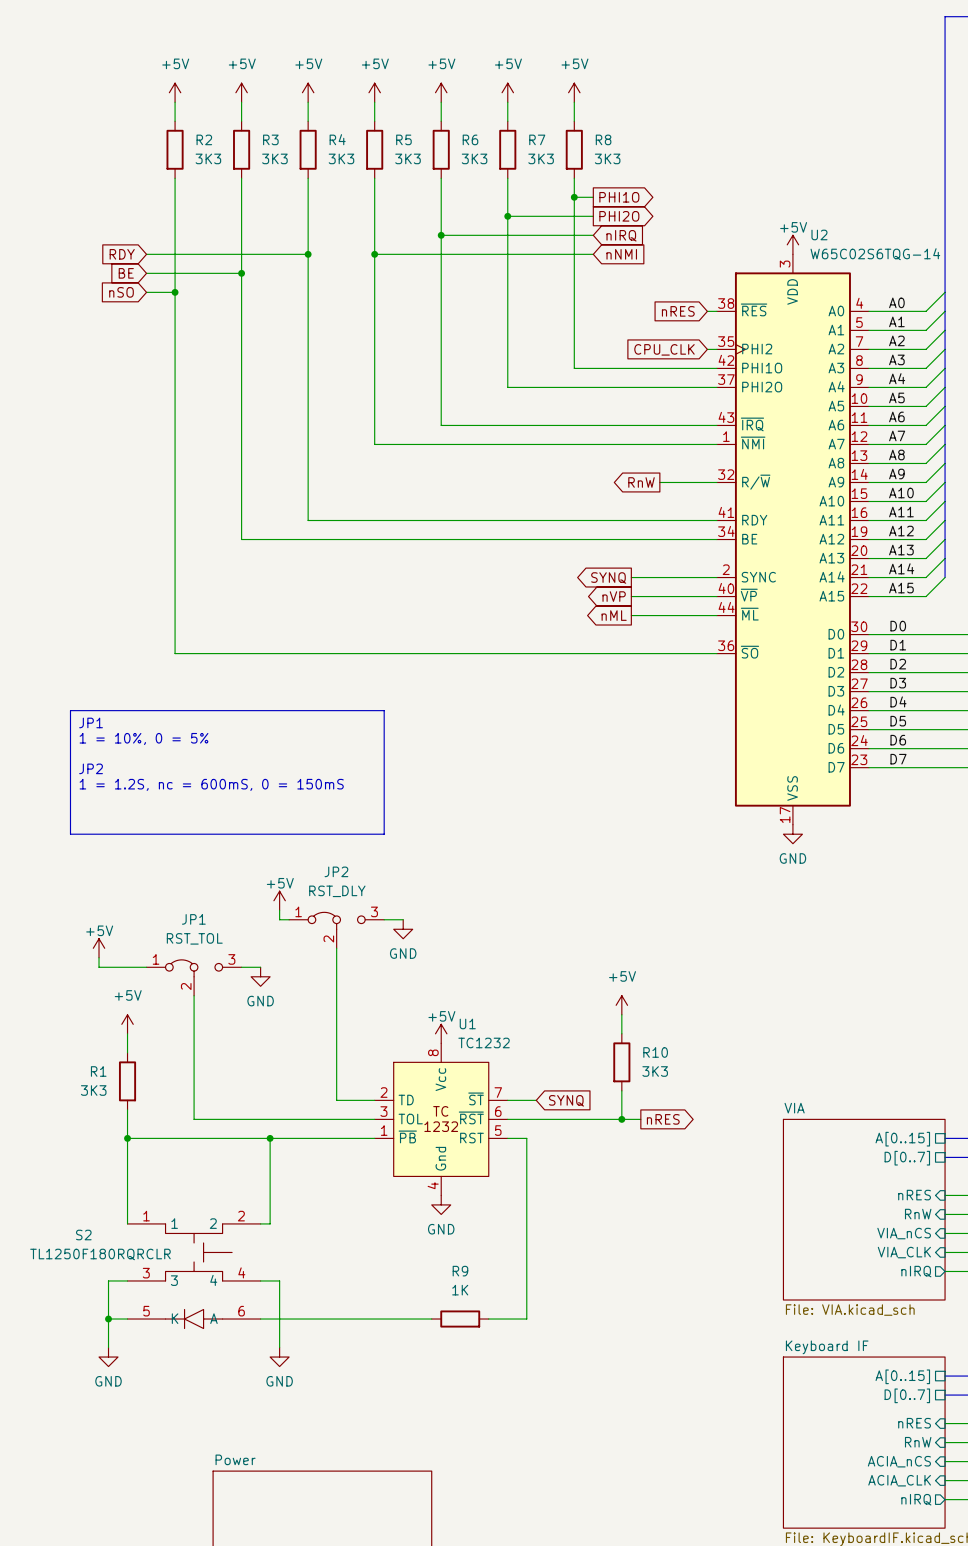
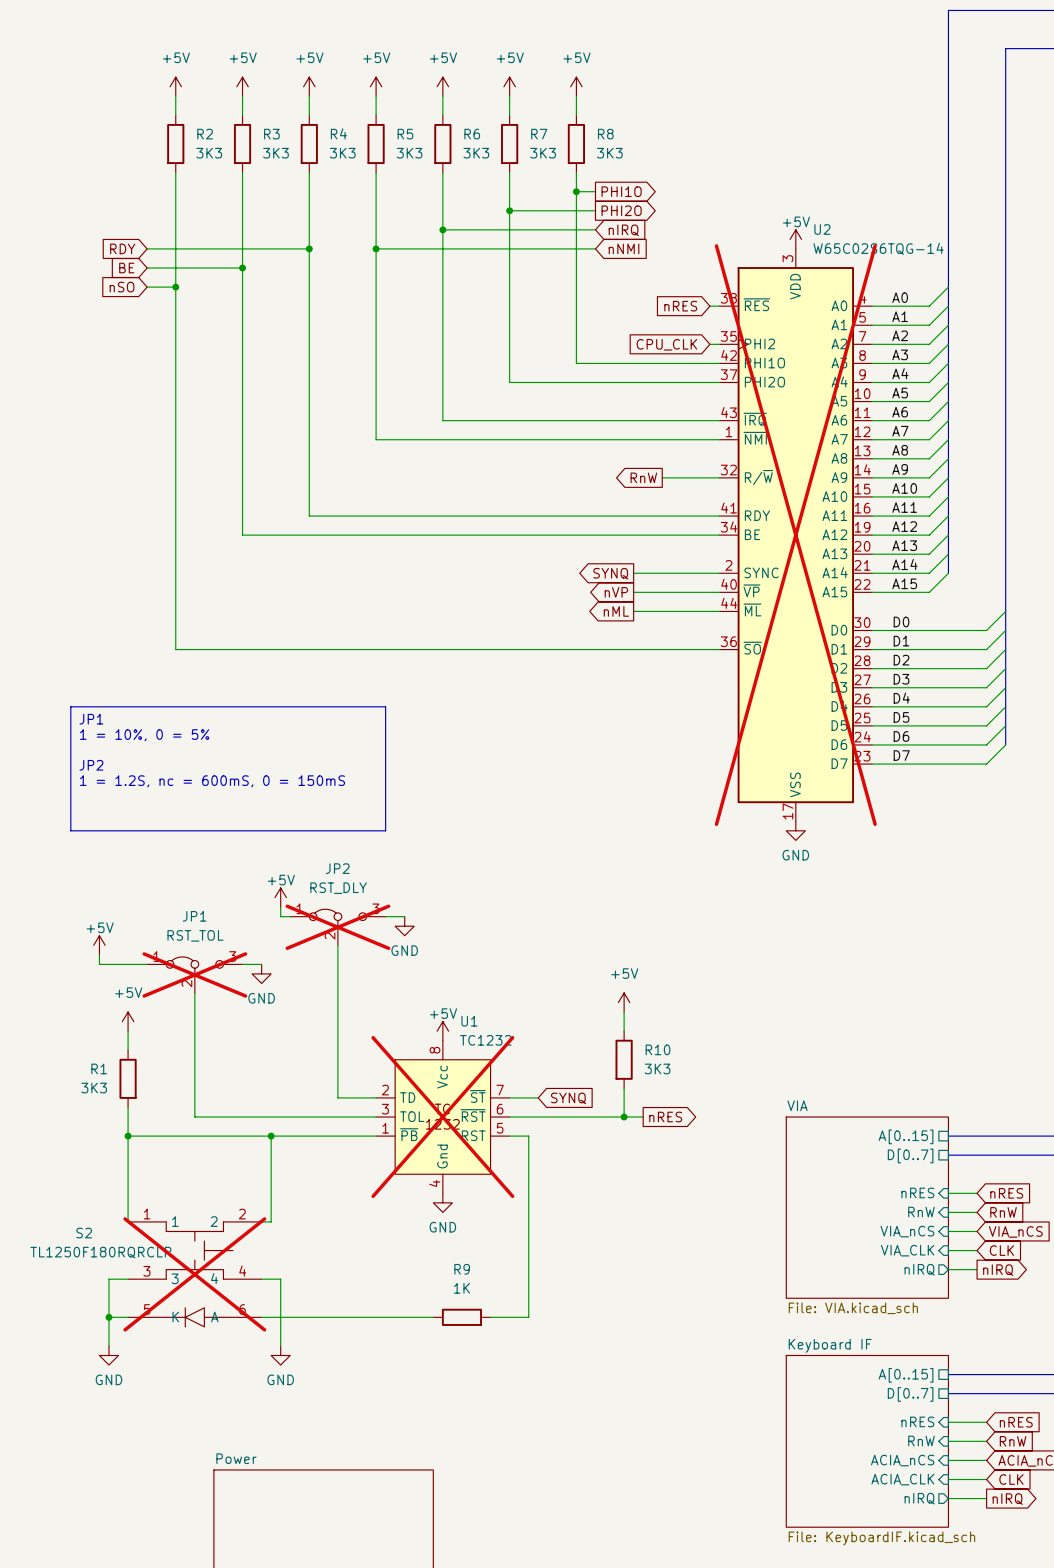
U2 do-not-place cross: none -> (795, 535)
JP2 do-not-place cross: none -> (337, 927)
JP1 do-not-place cross: none -> (194, 974)
U1 do-not-place cross: none -> (442, 1117)
S2 do-not-place cross: none -> (194, 1274)

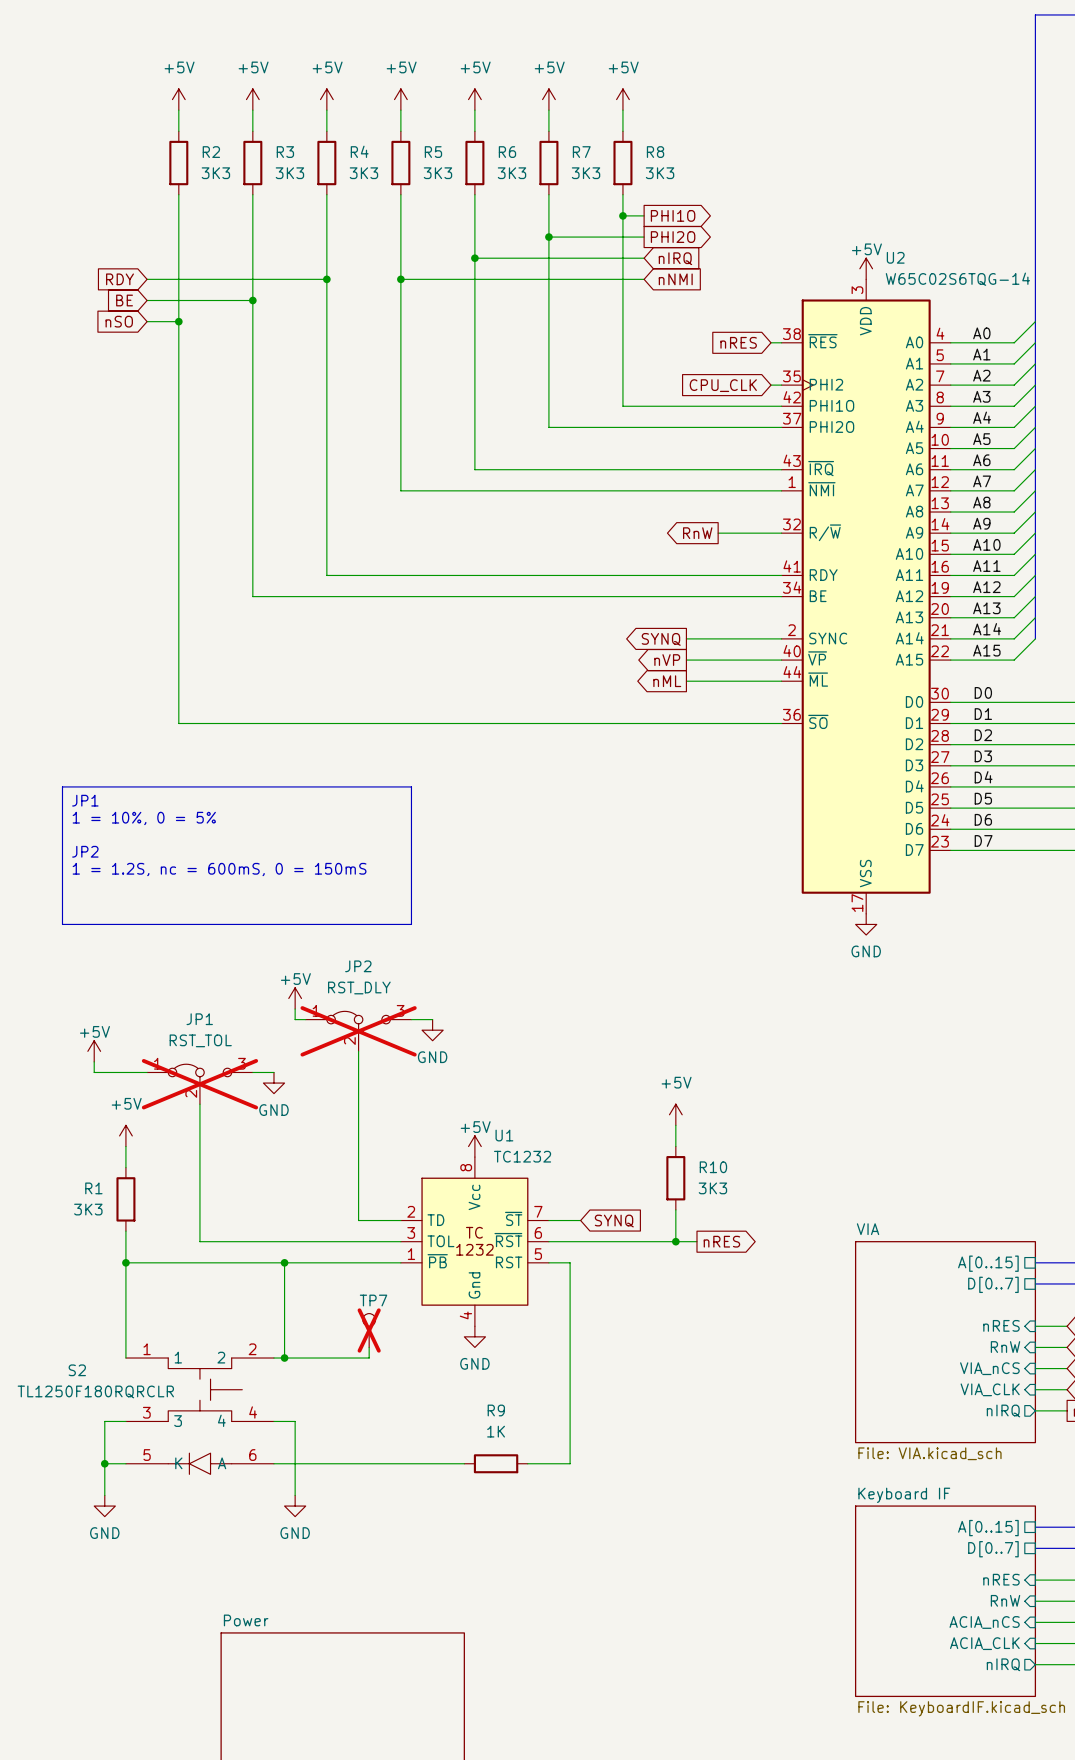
U2 do-not-place cross: (795, 535) -> none
U1 do-not-place cross: (442, 1117) -> none
TP7: none -> (369, 1330)
wire: none -> (369, 1347) (369, 1358) (284, 1358)
junction: none -> (284, 1358)
S2 do-not-place cross: (194, 1274) -> none

